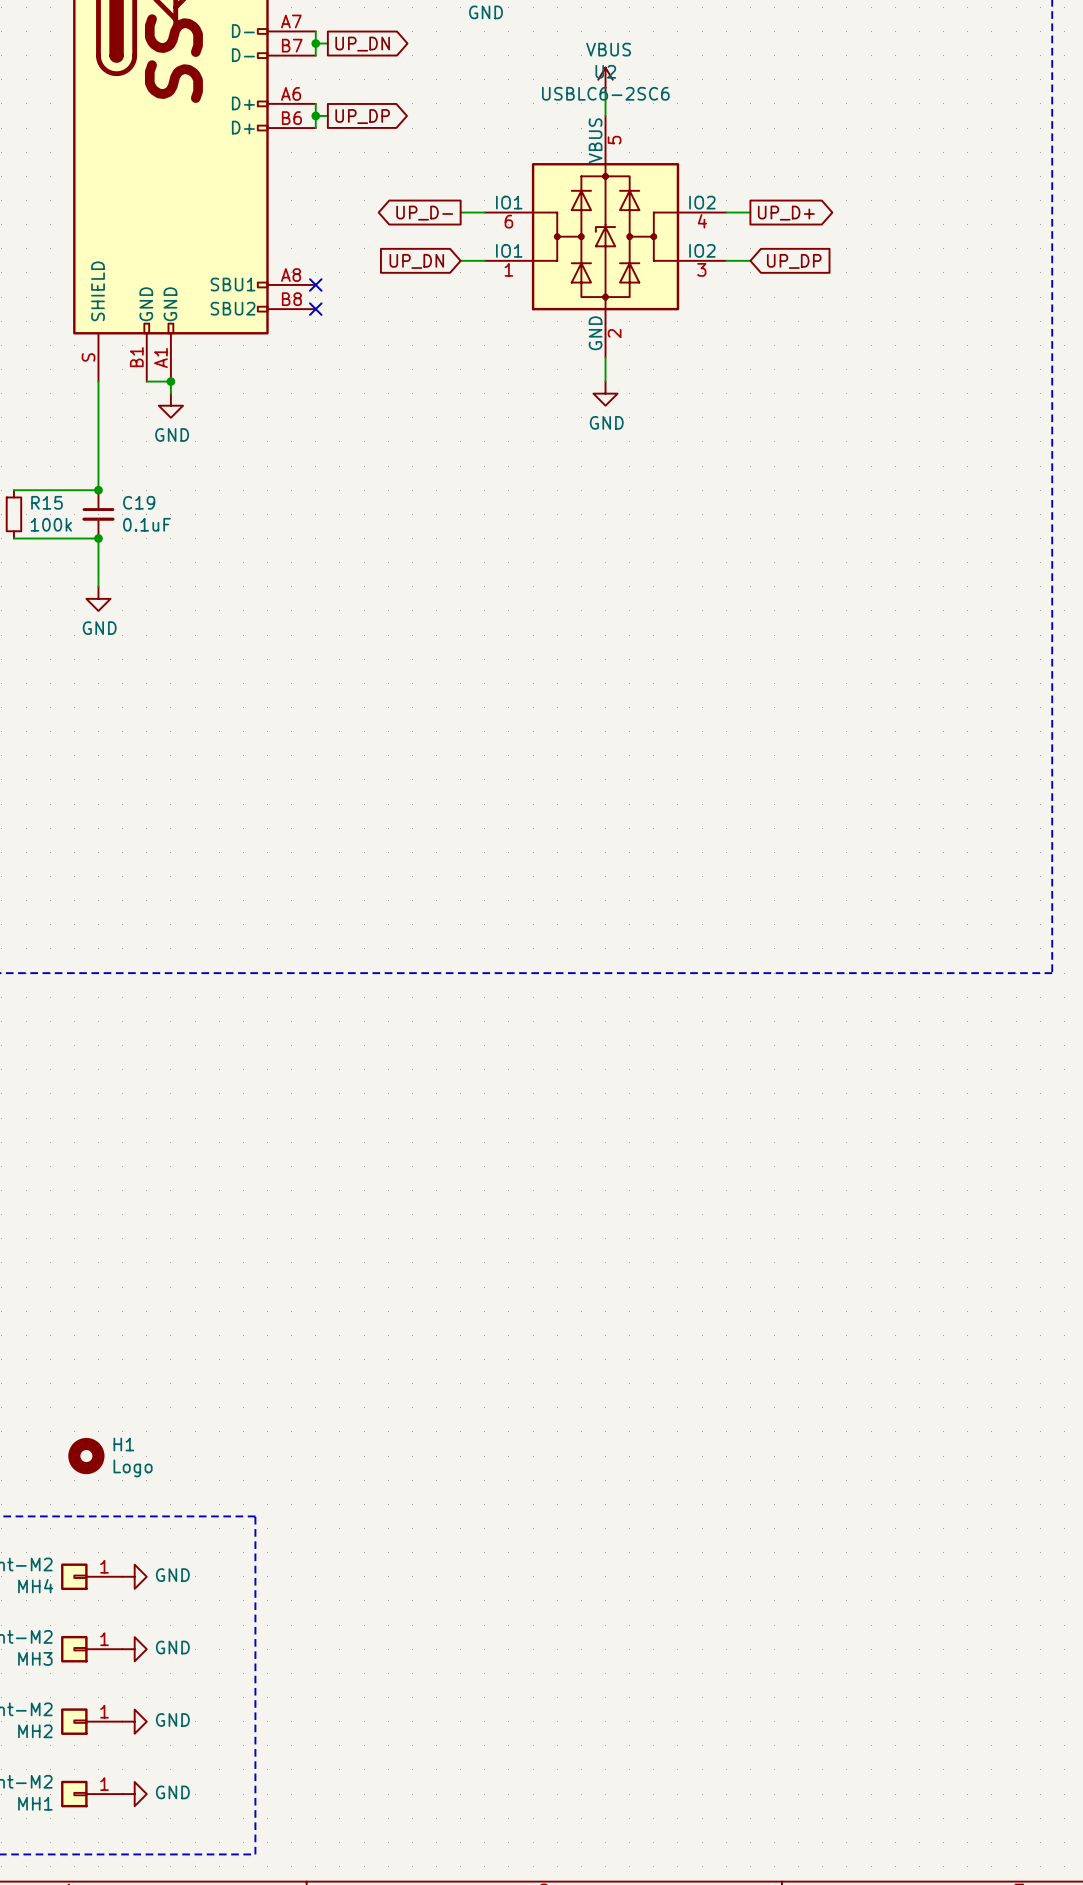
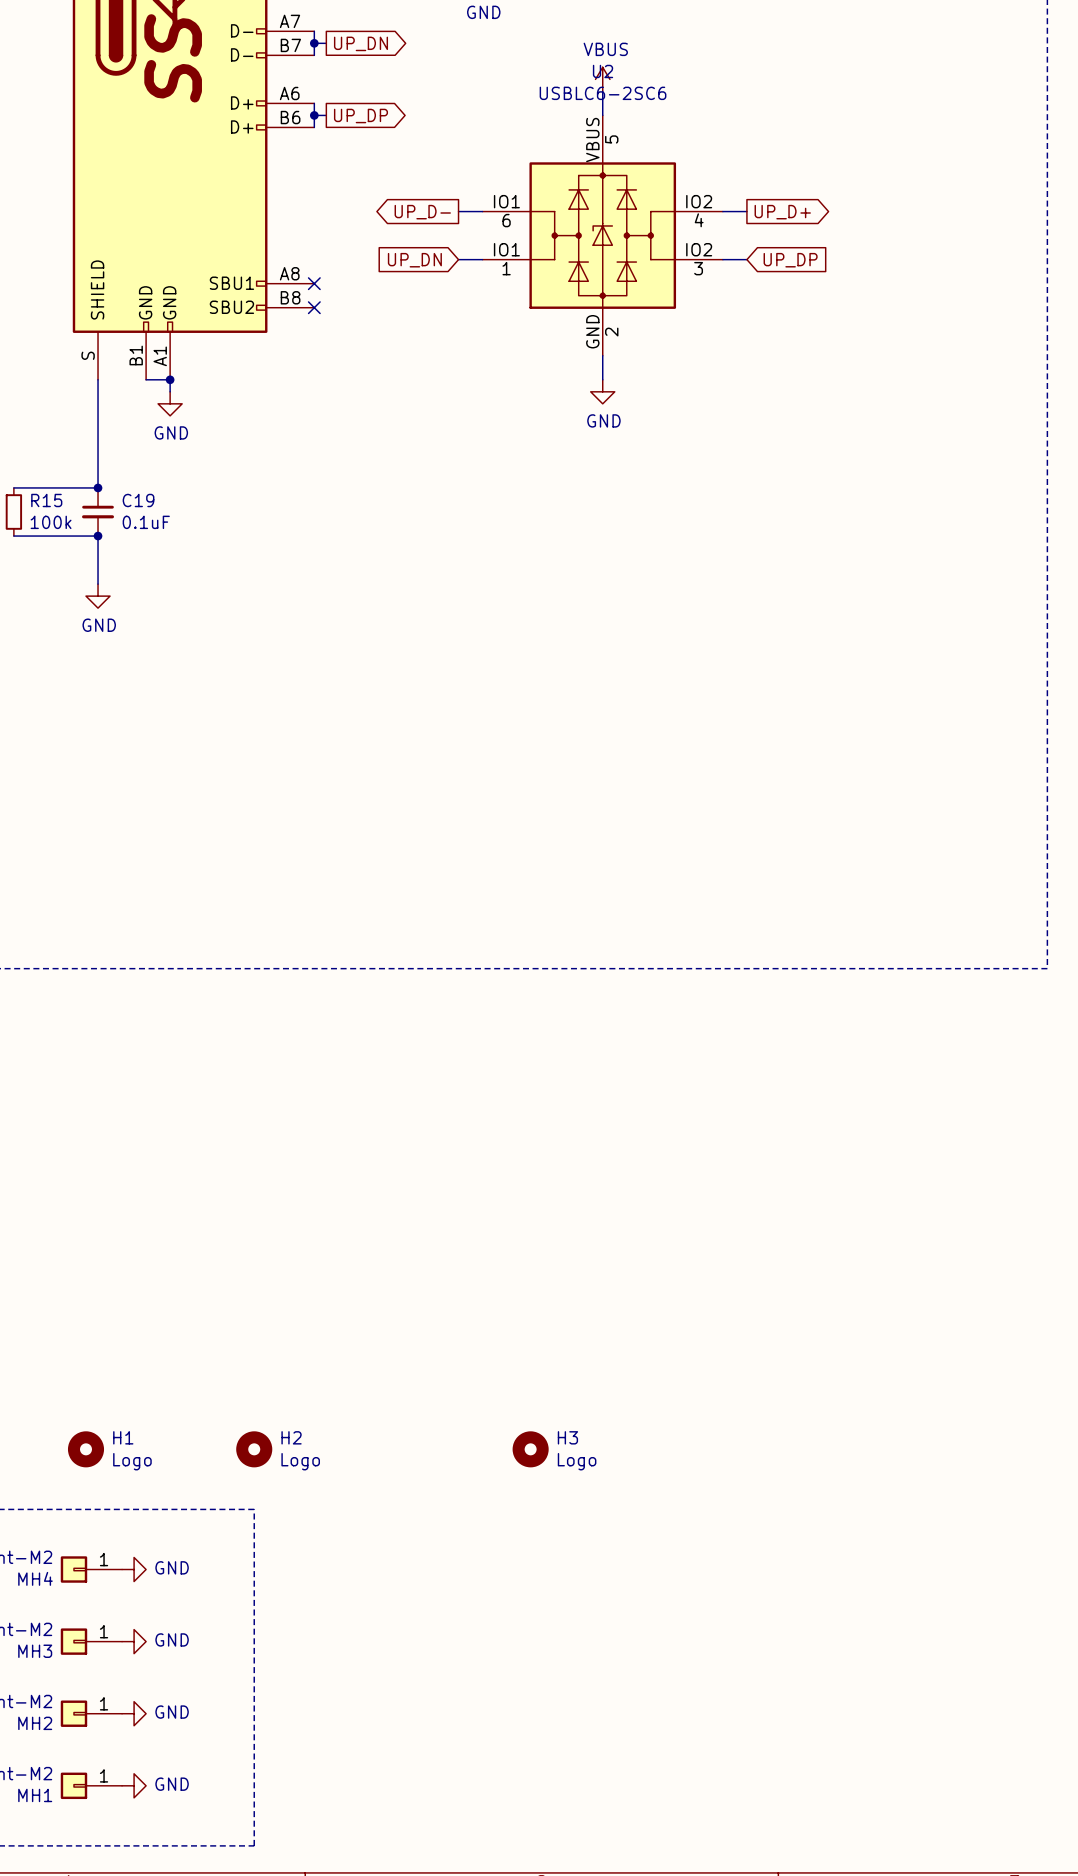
H2: none -> Logo (254, 1449)
H3: none -> Logo (530, 1449)

